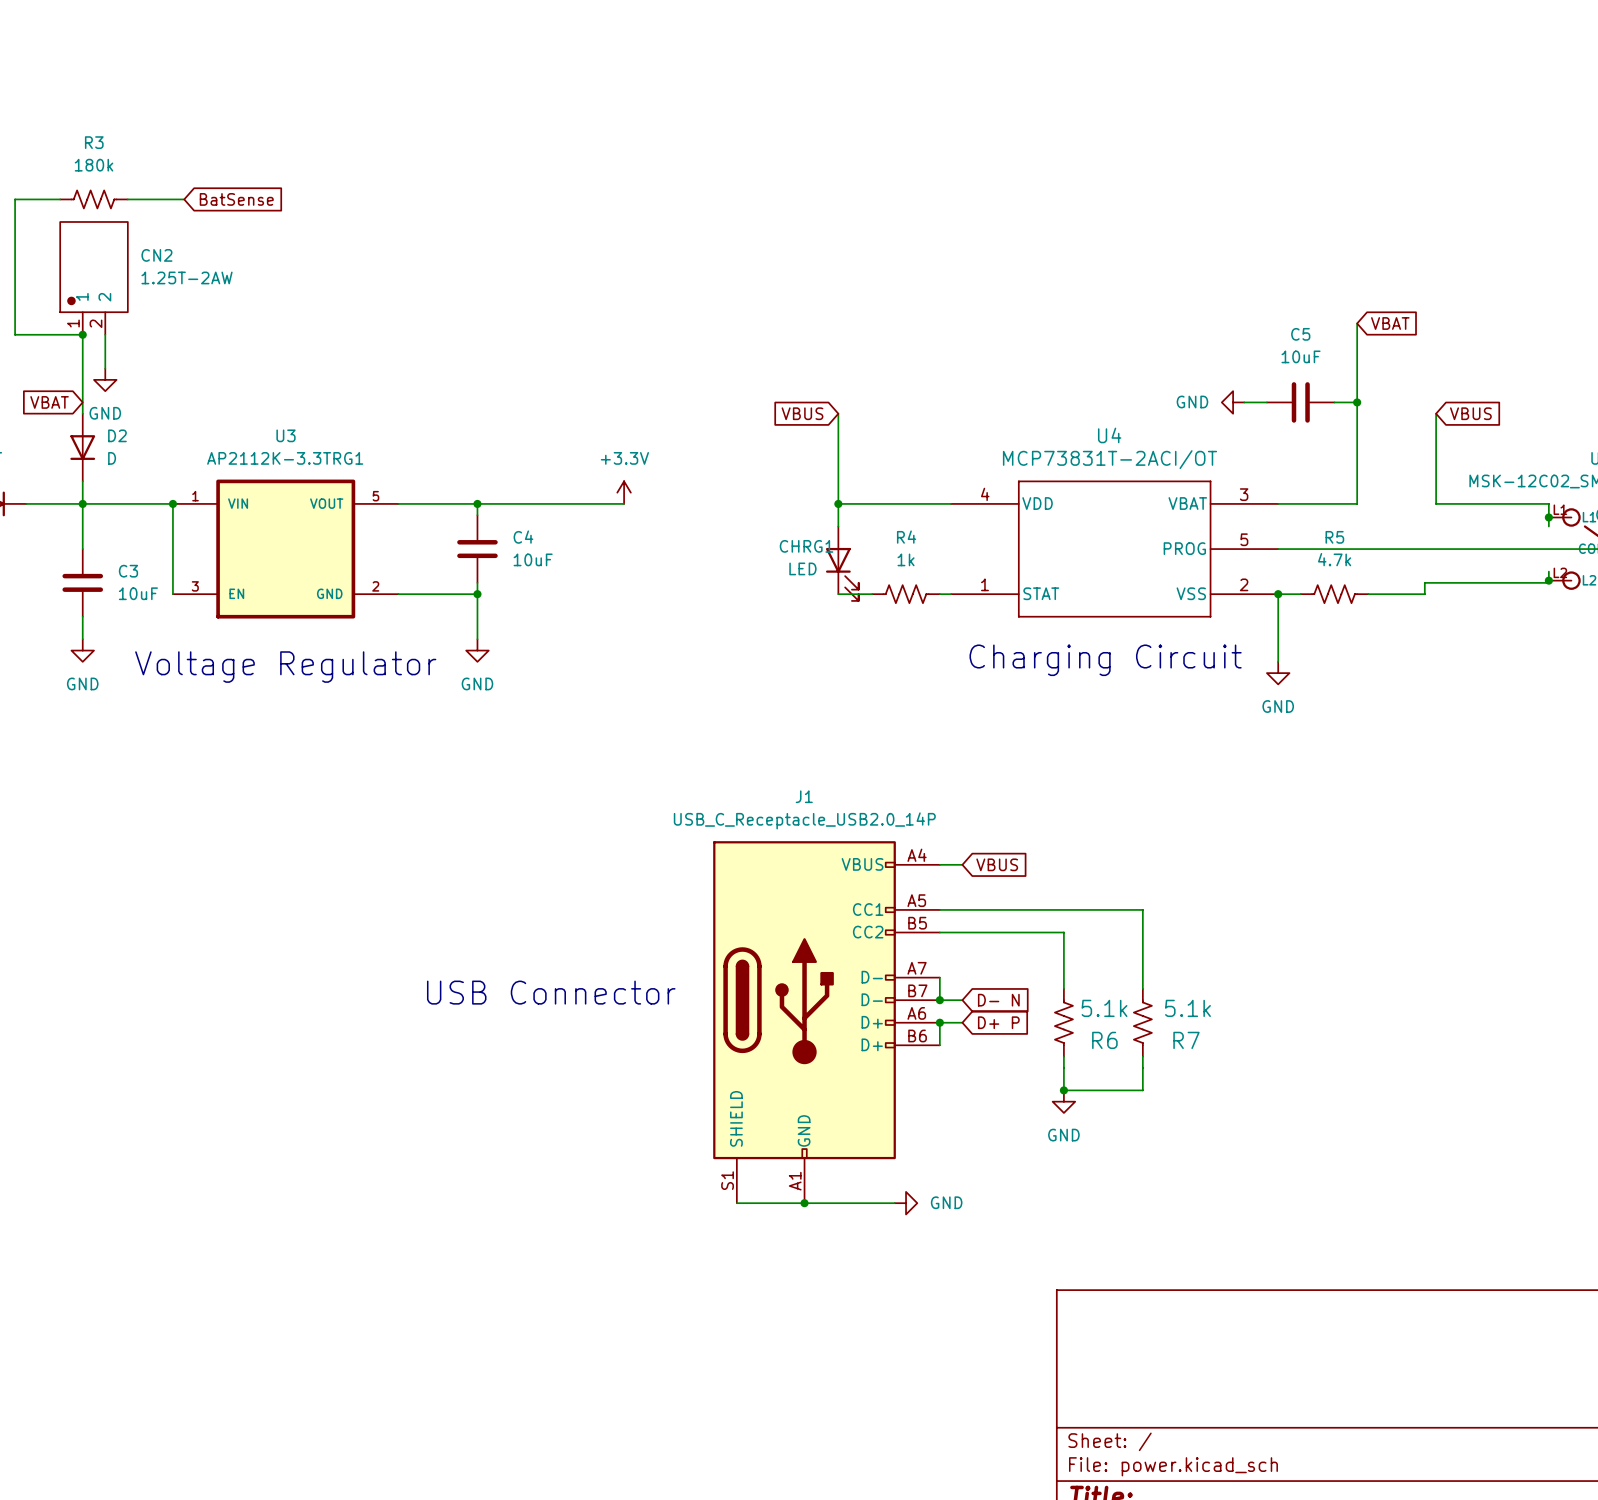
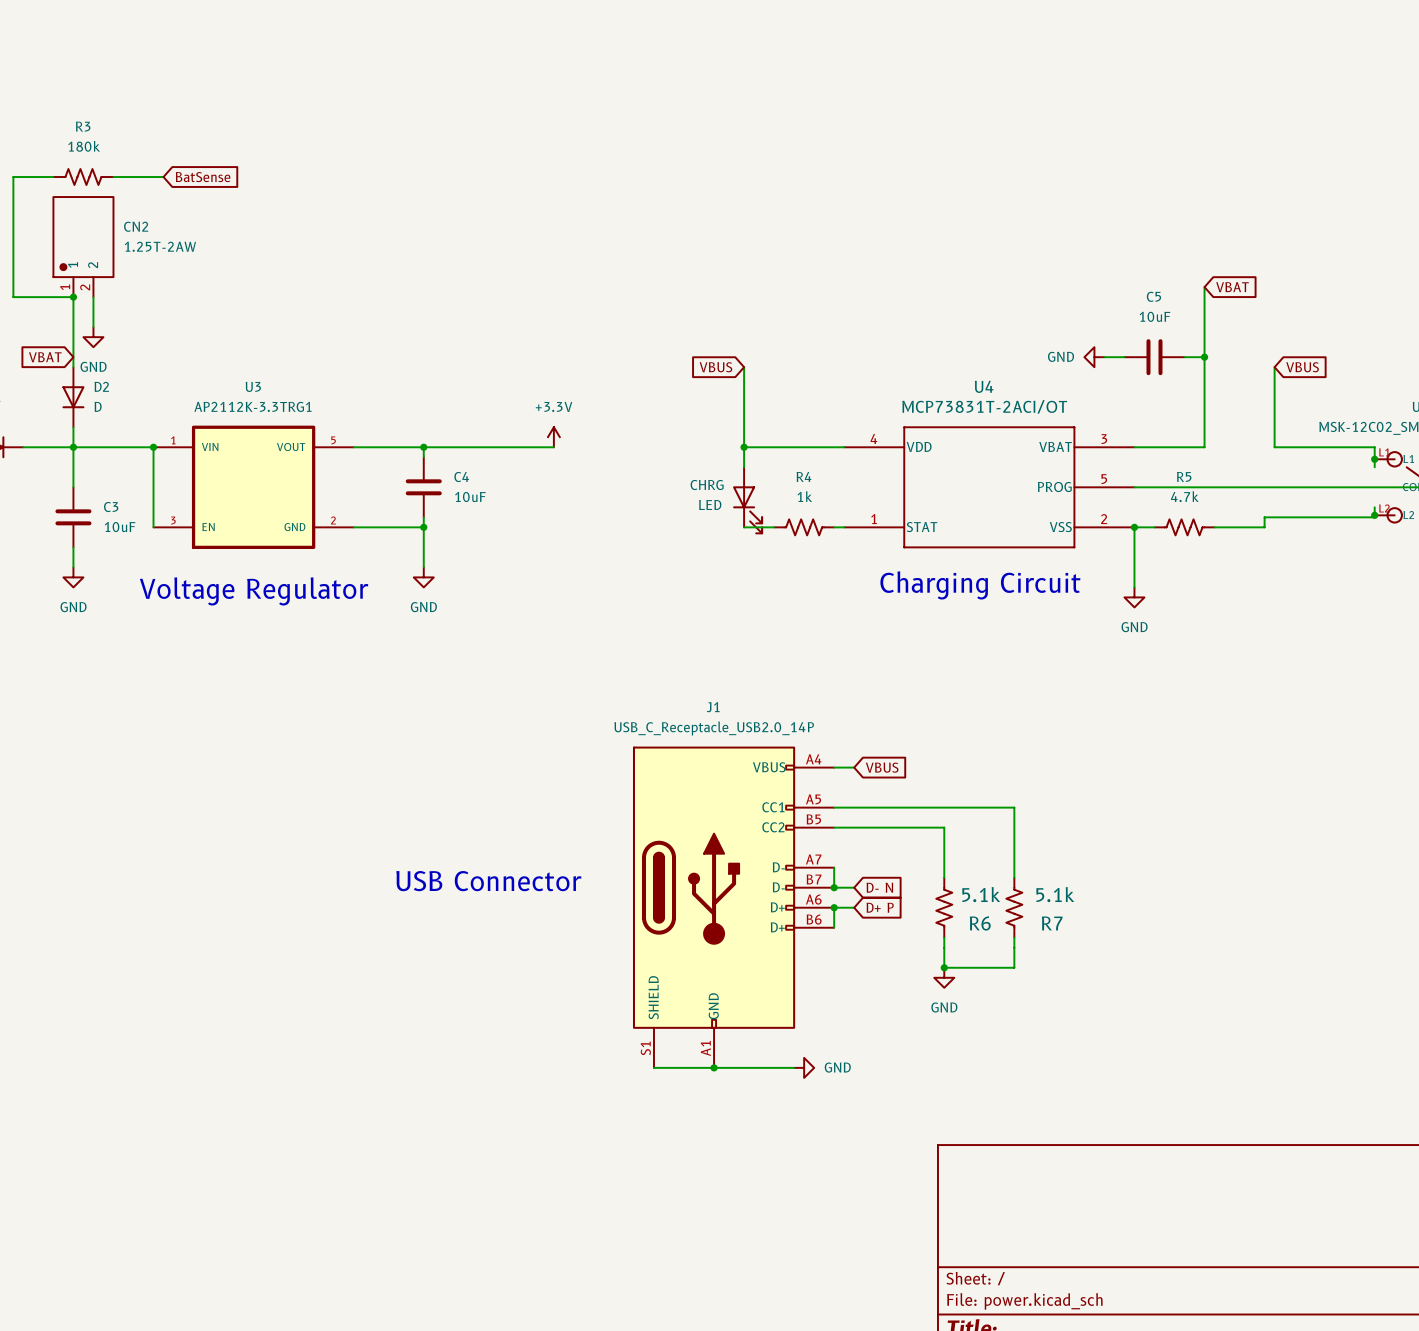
CHRG1 name: CHRG1 (806, 546) -> CHRG (707, 484)

